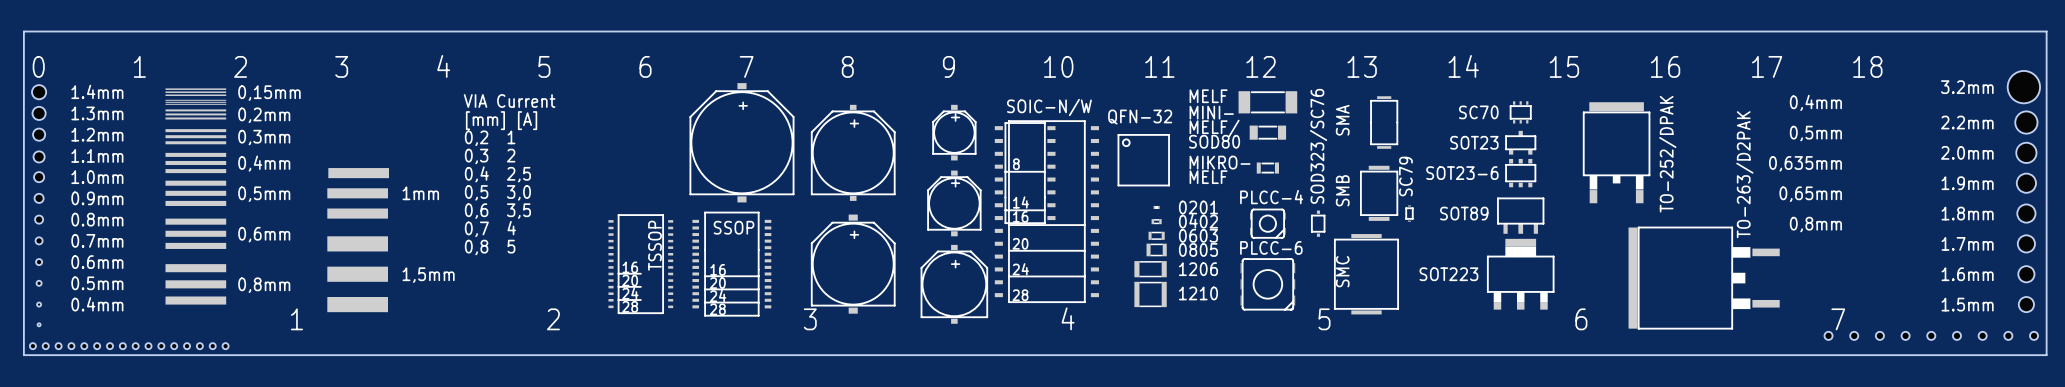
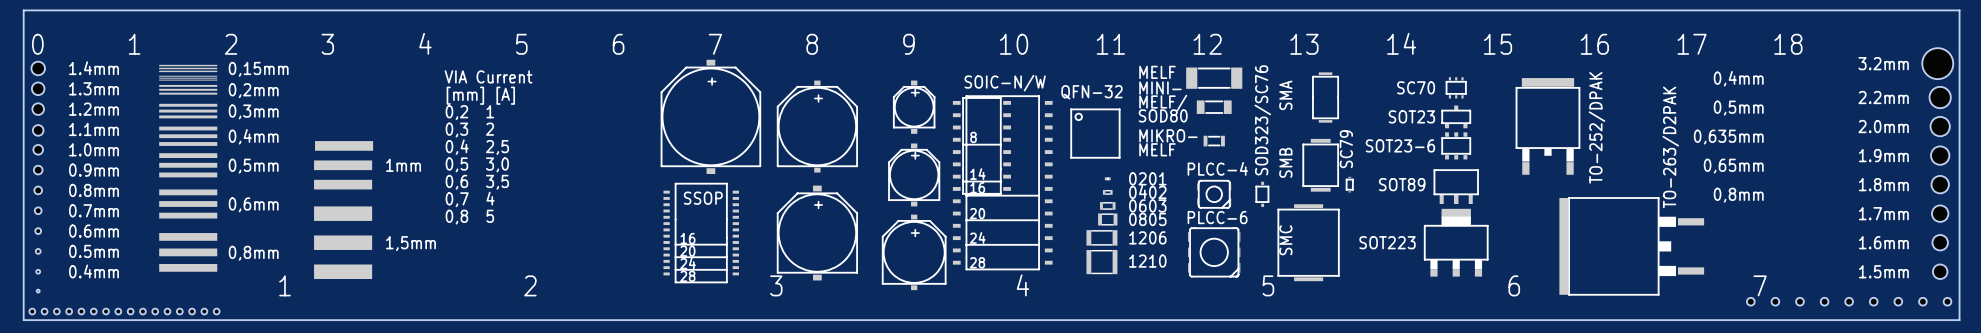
text: TSSOP (655, 245) -> none
part: (640, 264) -> none

